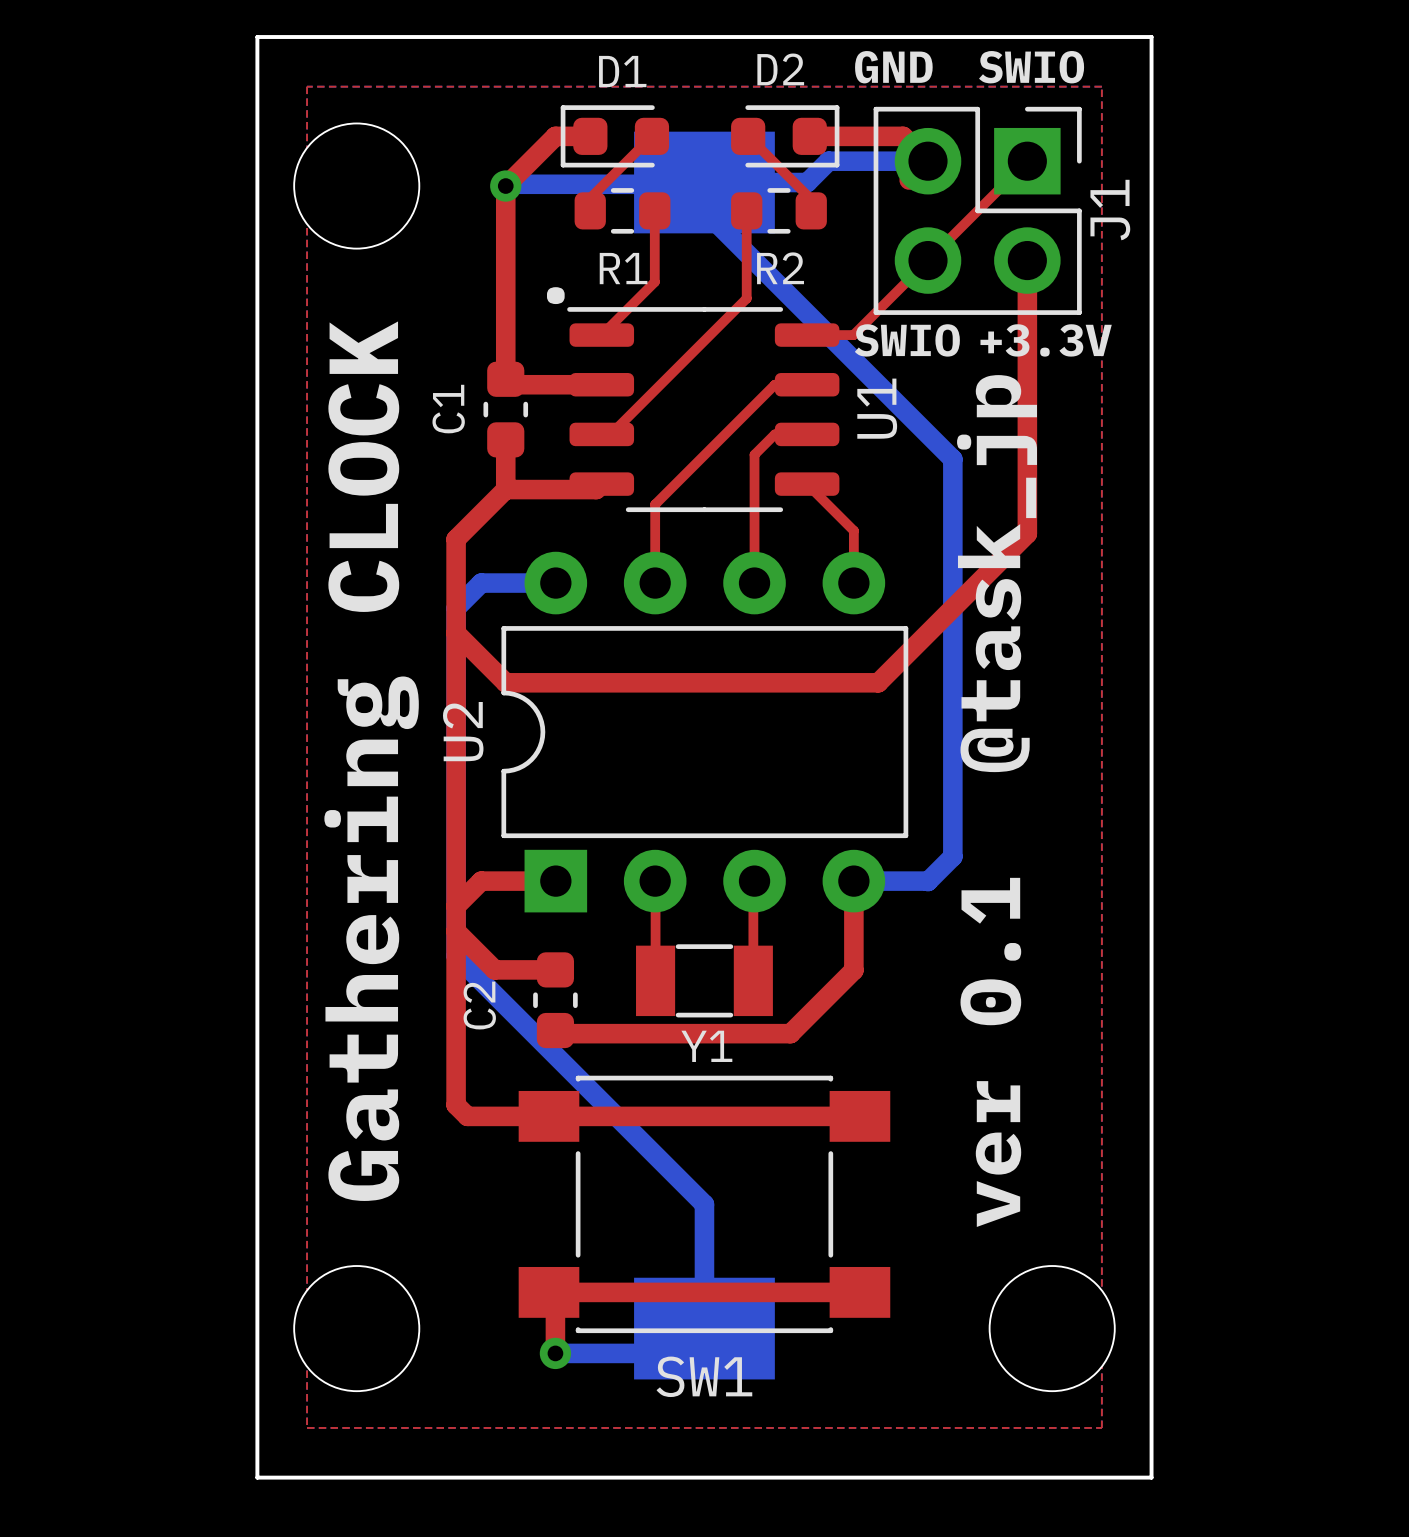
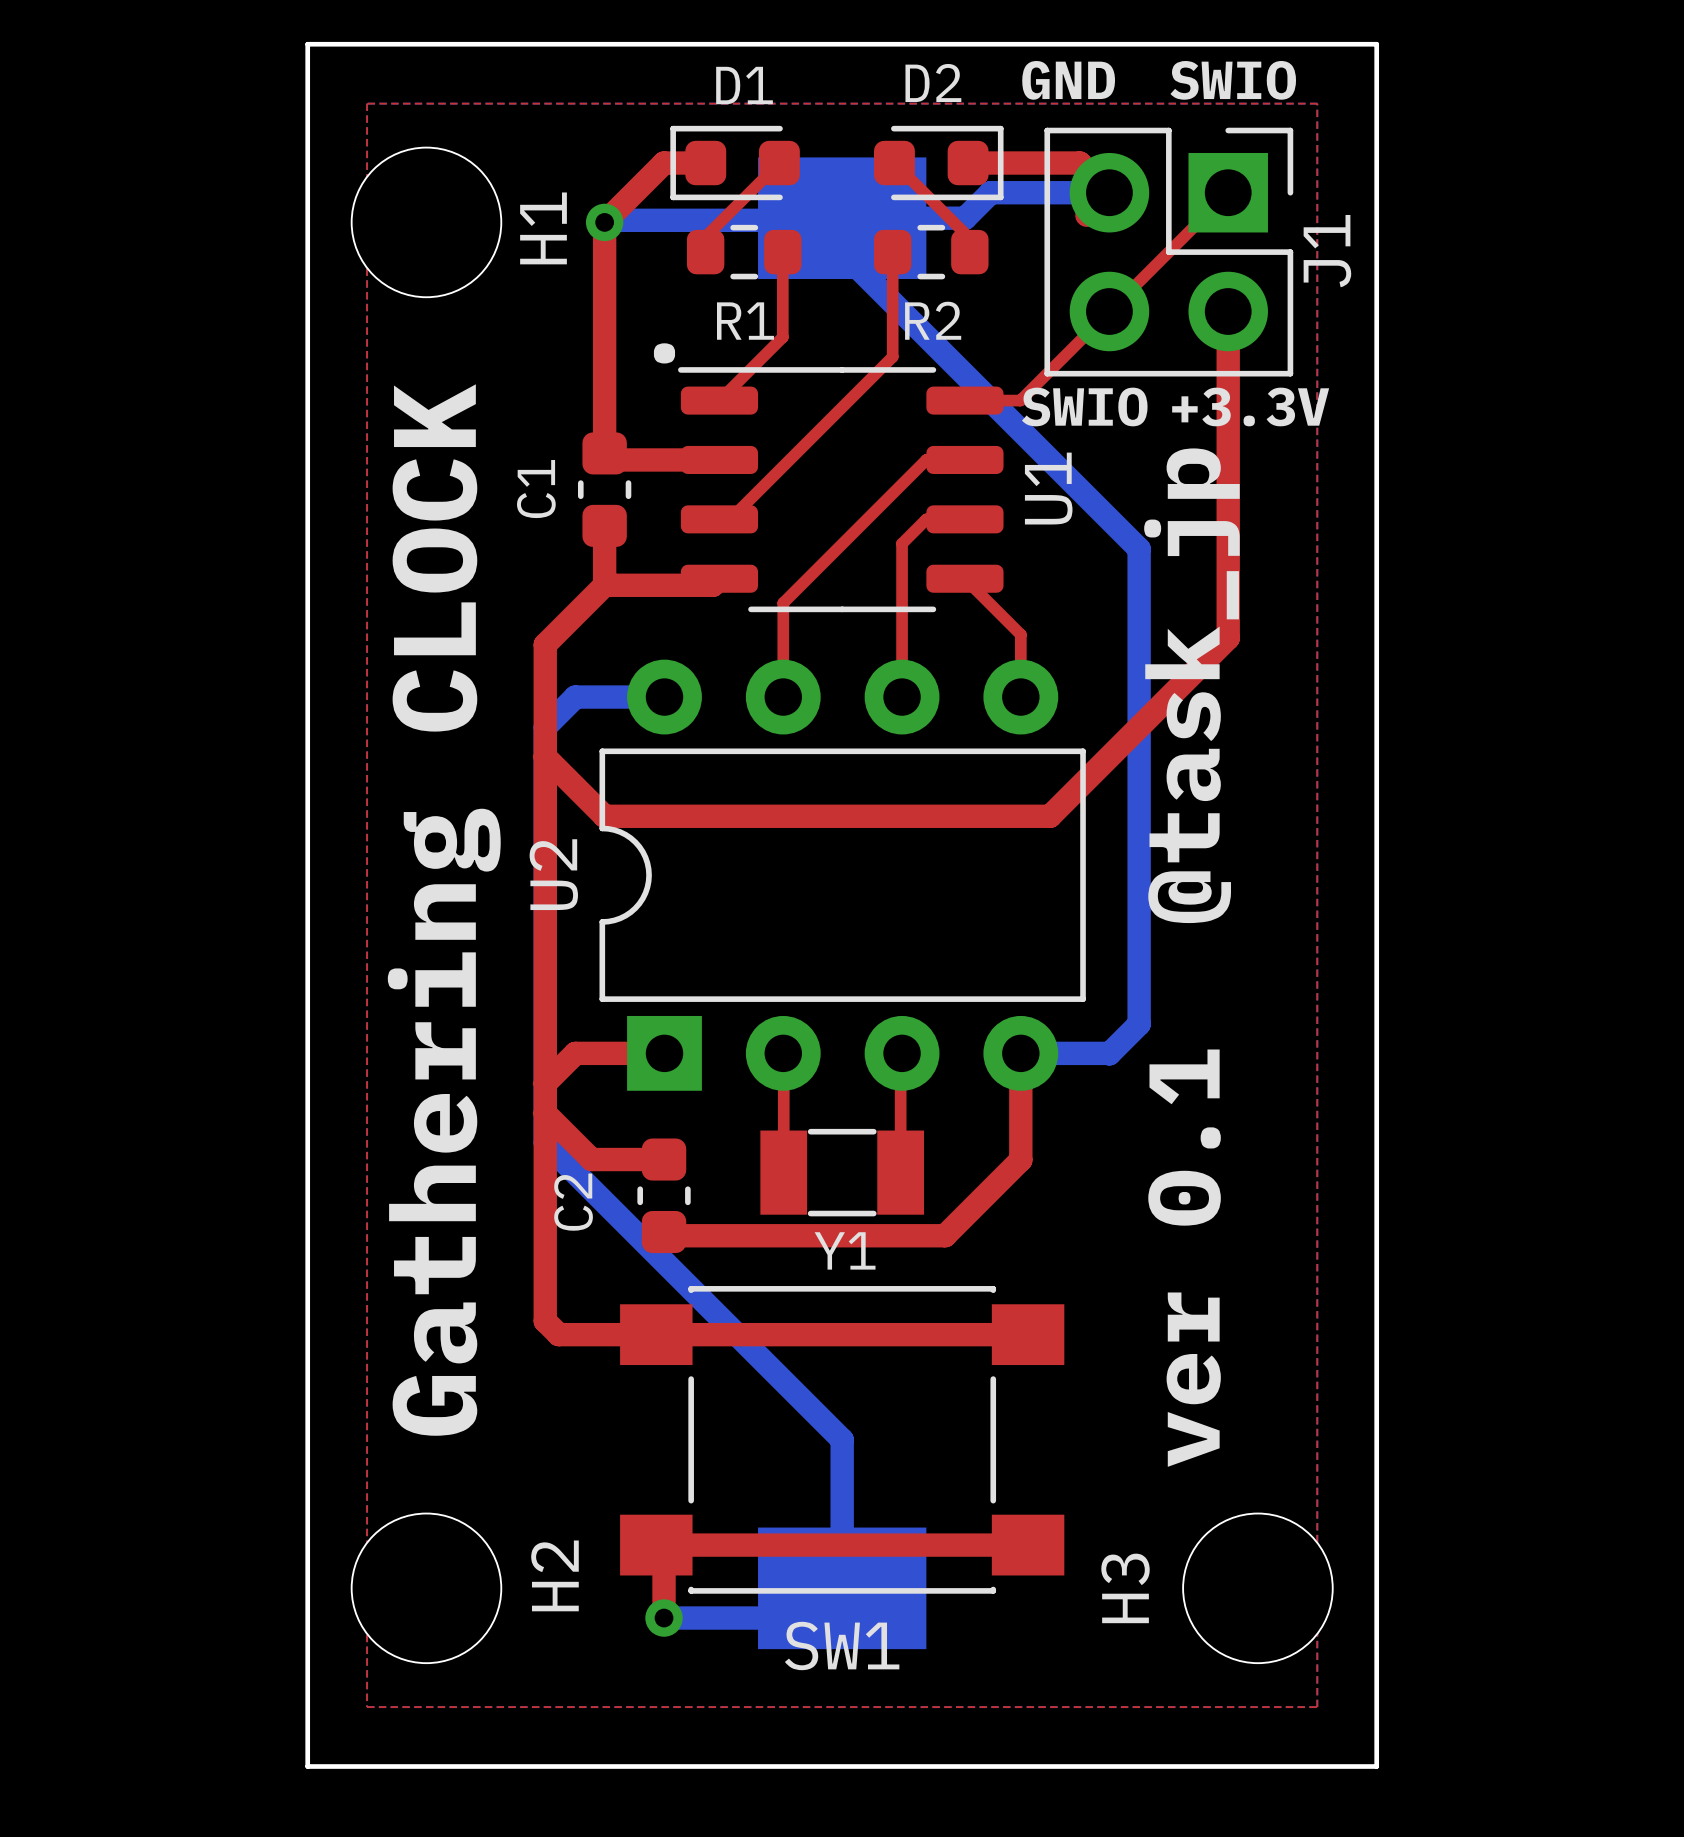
H1 name: none -> H1 (543, 228)
H2 name: none -> H2 (554, 1575)
H3 name: none -> H3 (1125, 1588)

